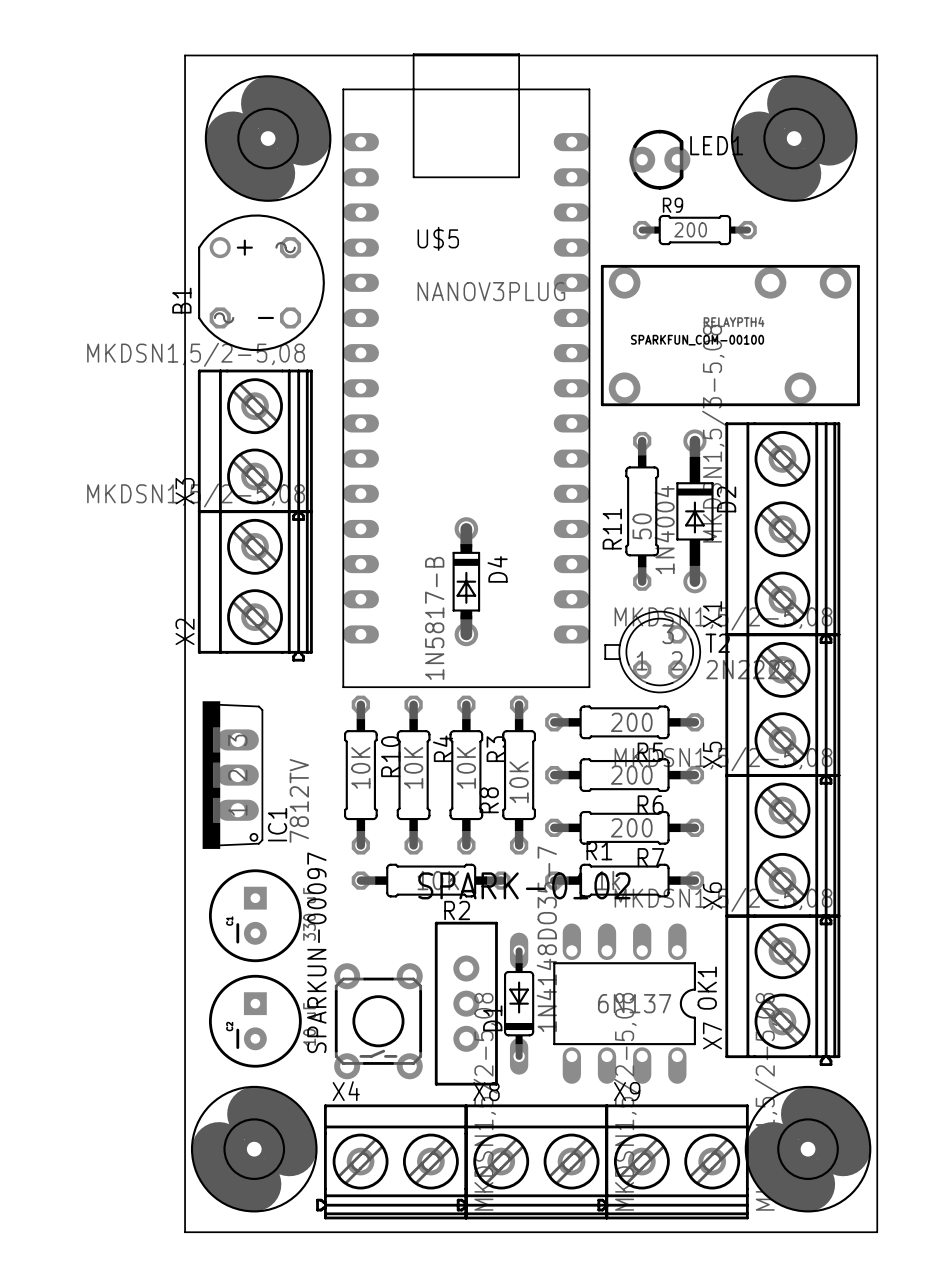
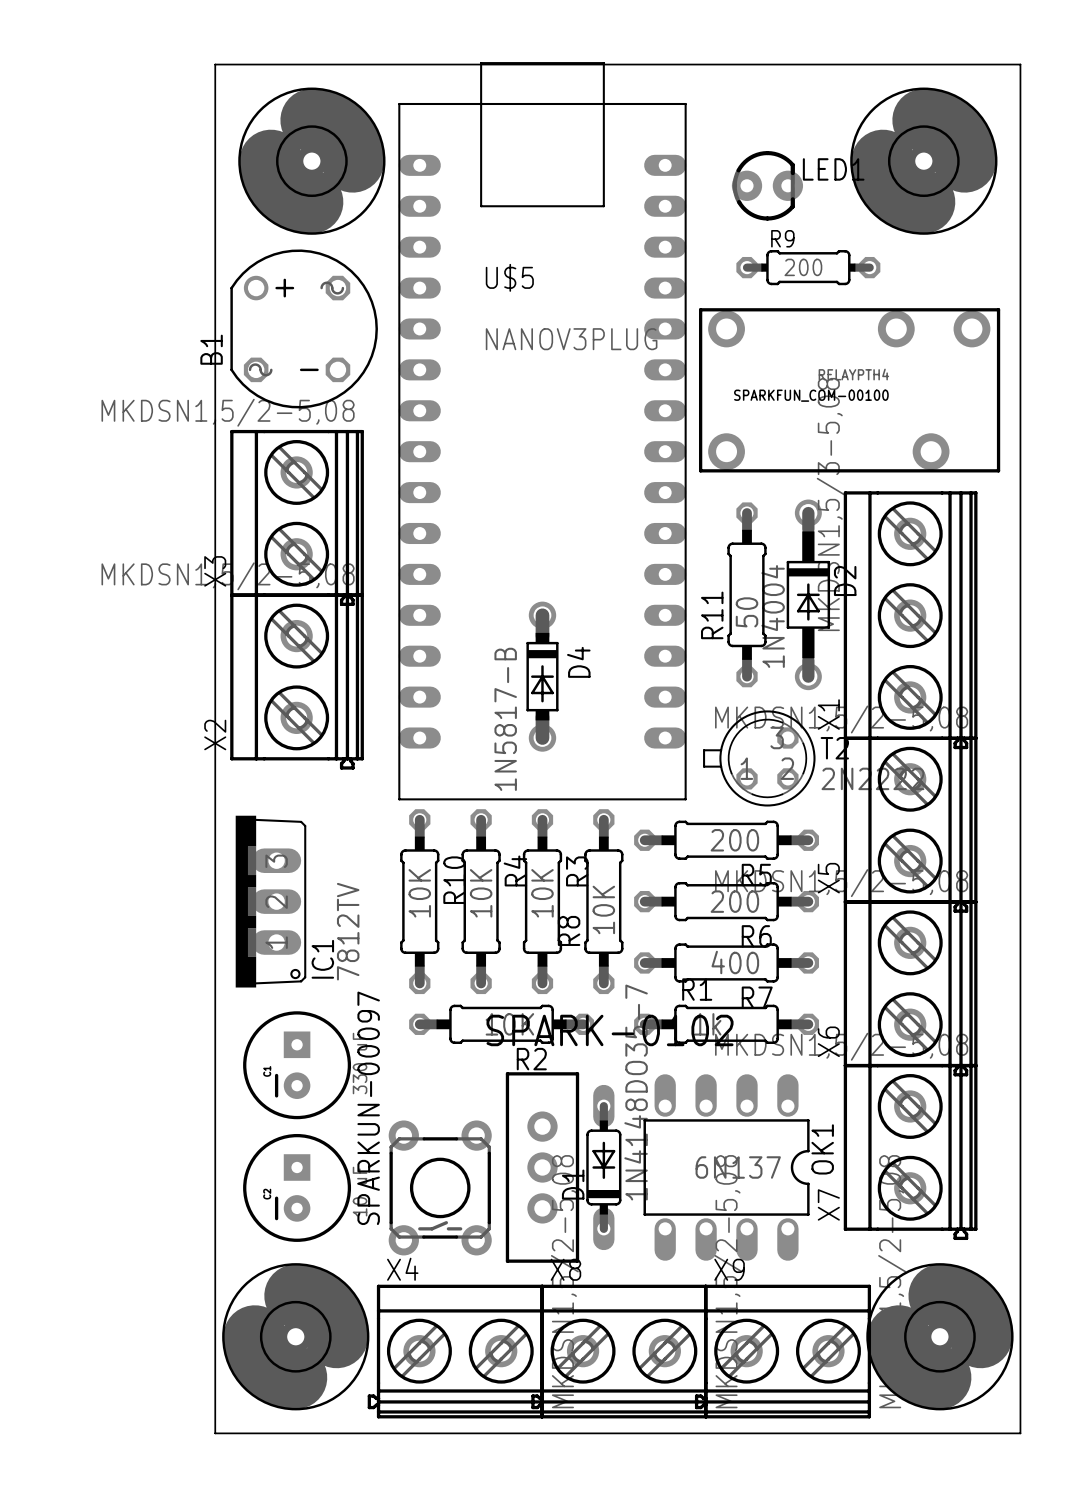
R7 value: 200 (631, 827) -> 400 (735, 962)

